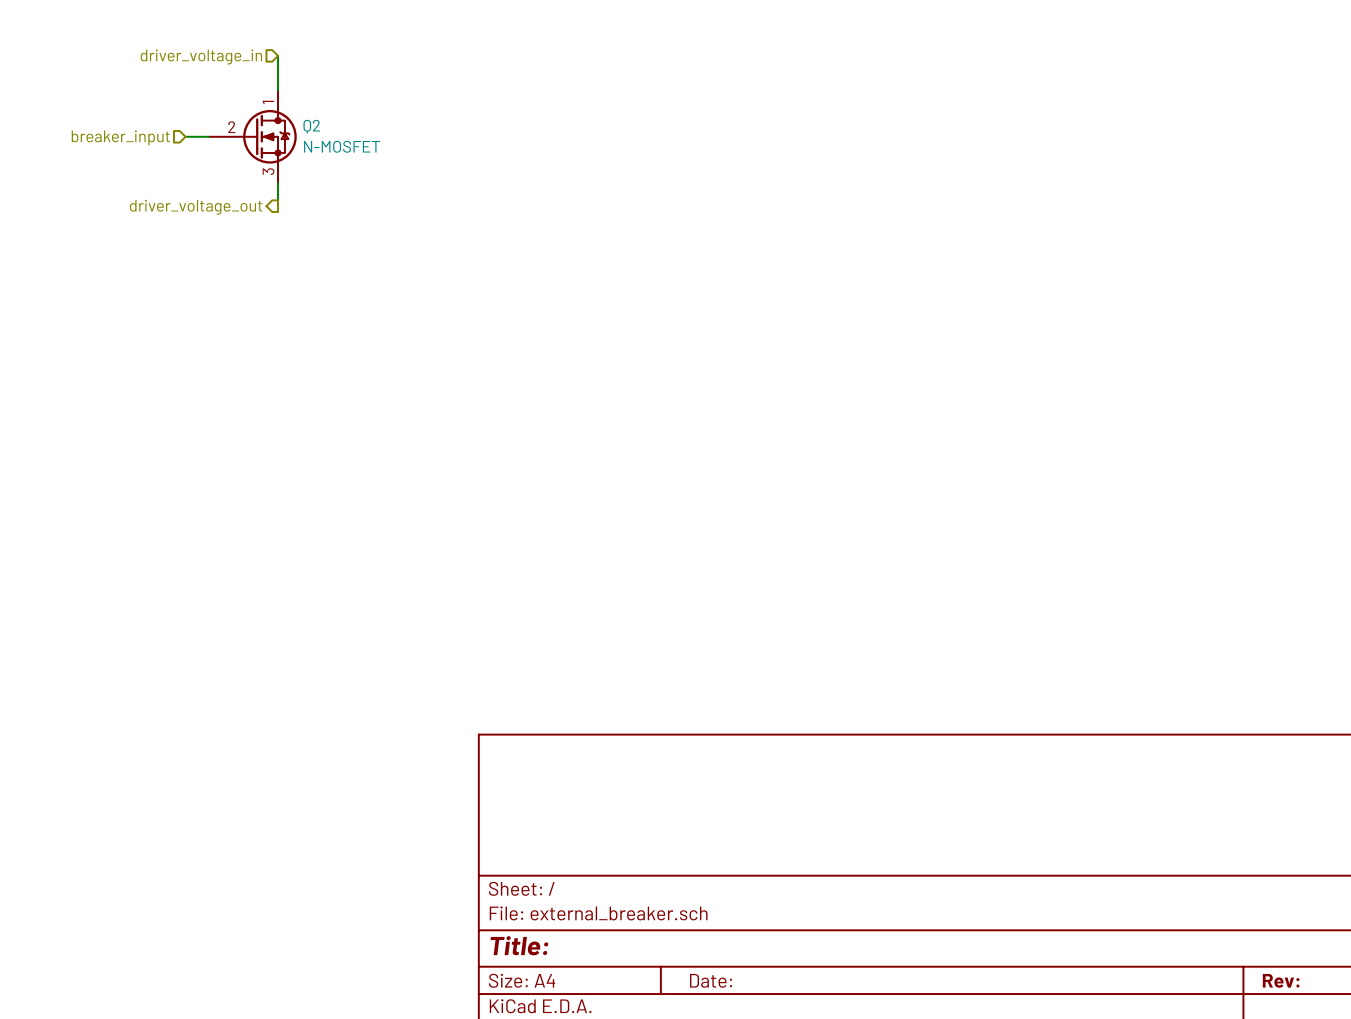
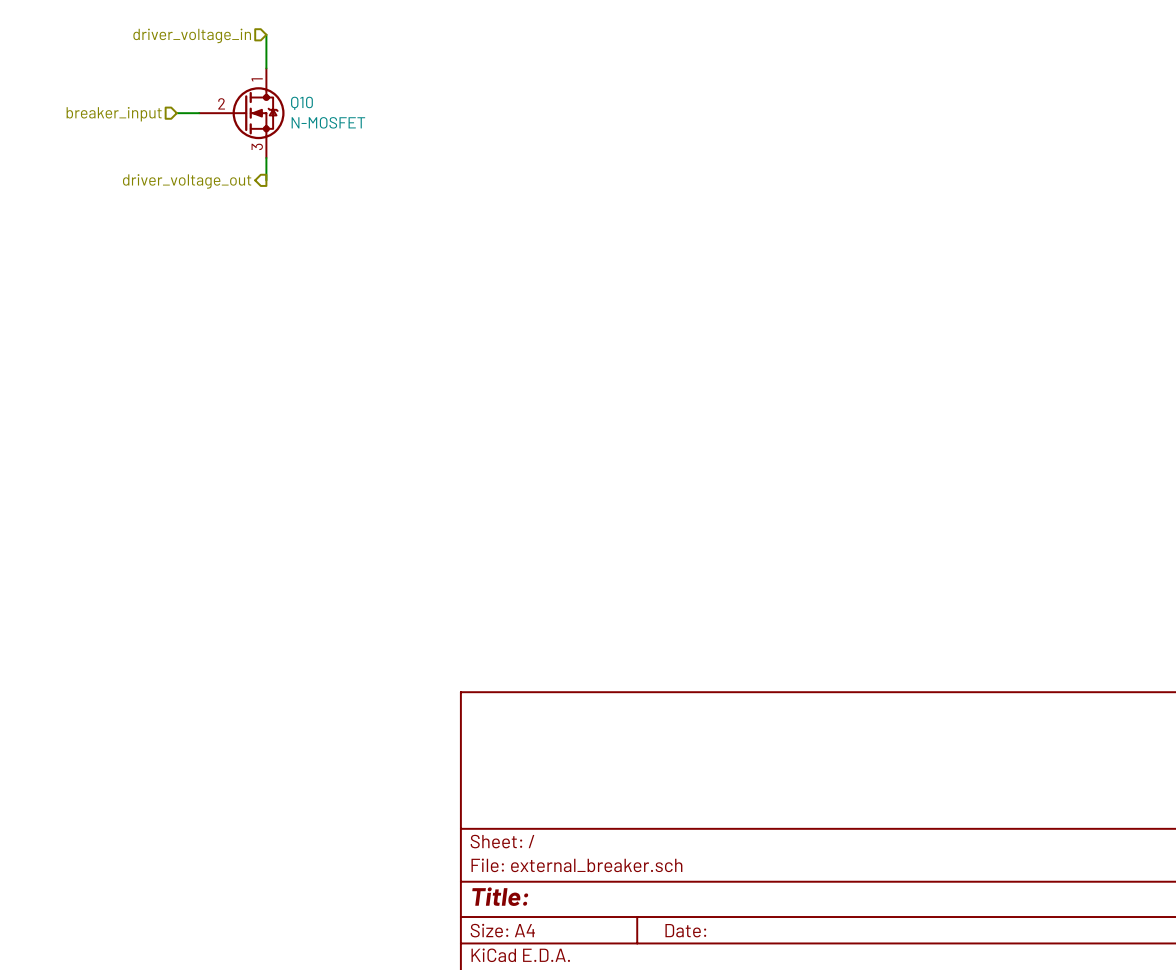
Q2 name: Q2 (311, 126) -> Q10 (301, 103)

